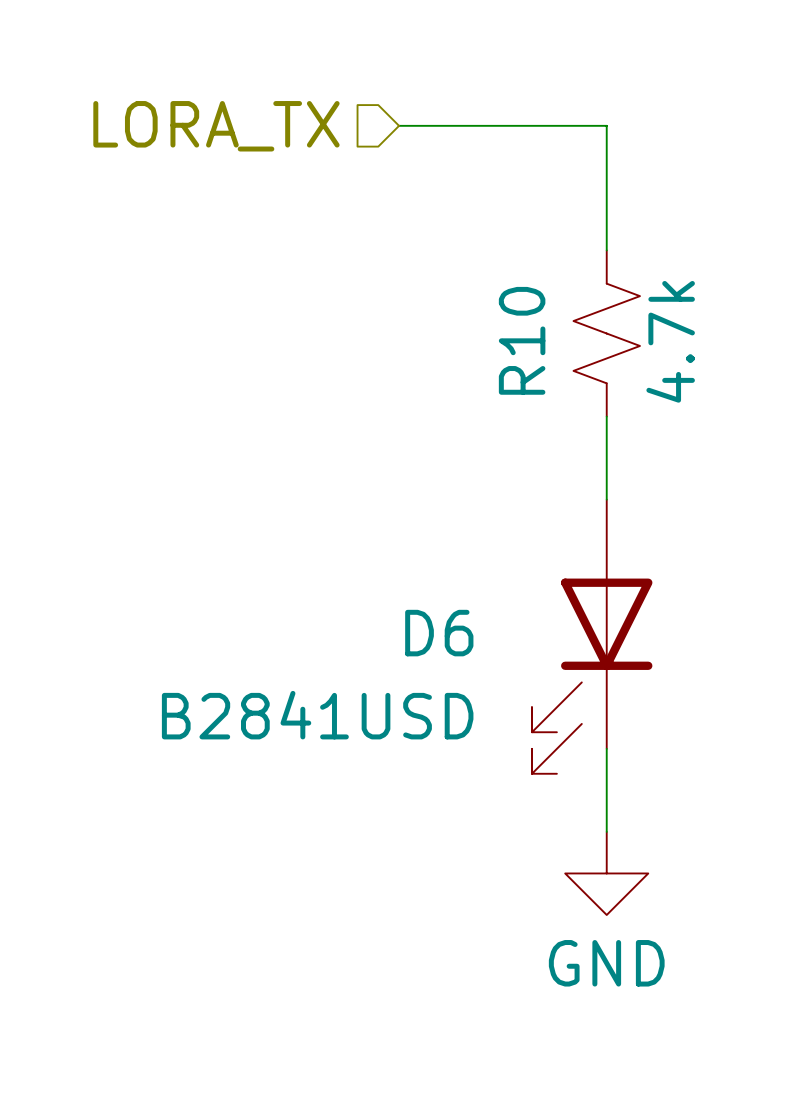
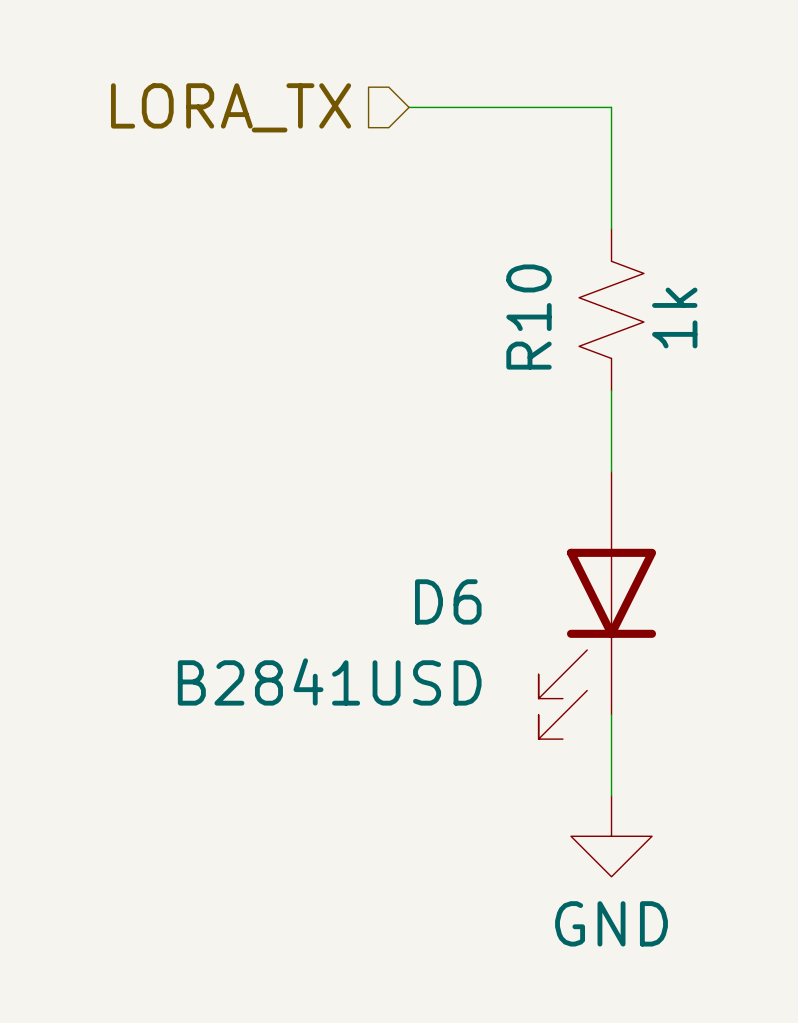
R10 value: 4.7k (670, 341) -> 1k (674, 317)

